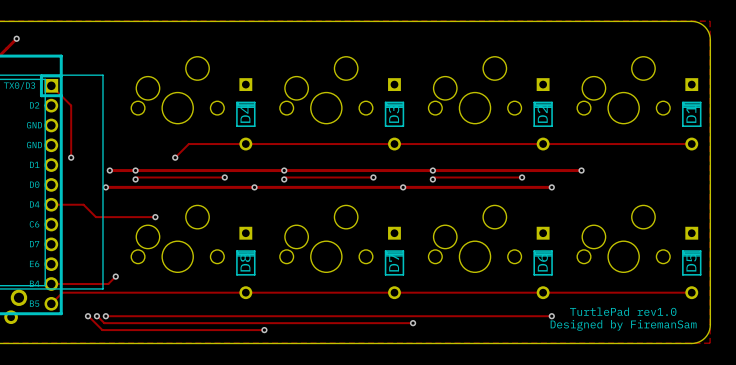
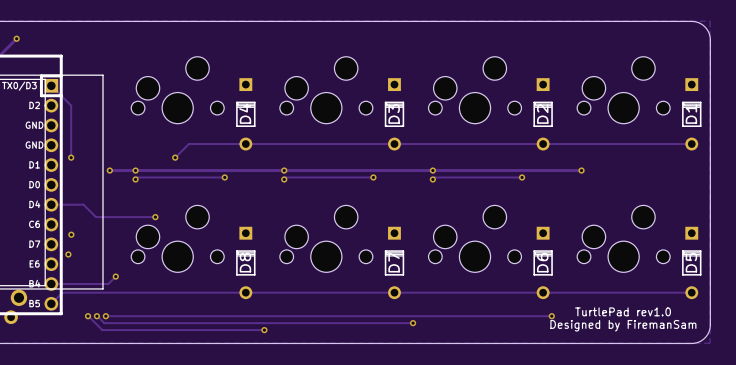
track: (105, 187) (551, 187) -> none
via: (105, 187) -> none
via: (254, 187) -> none
via: (403, 187) -> none
via: (551, 187) -> none
via: none -> (71, 234)
via: none -> (68, 254)

